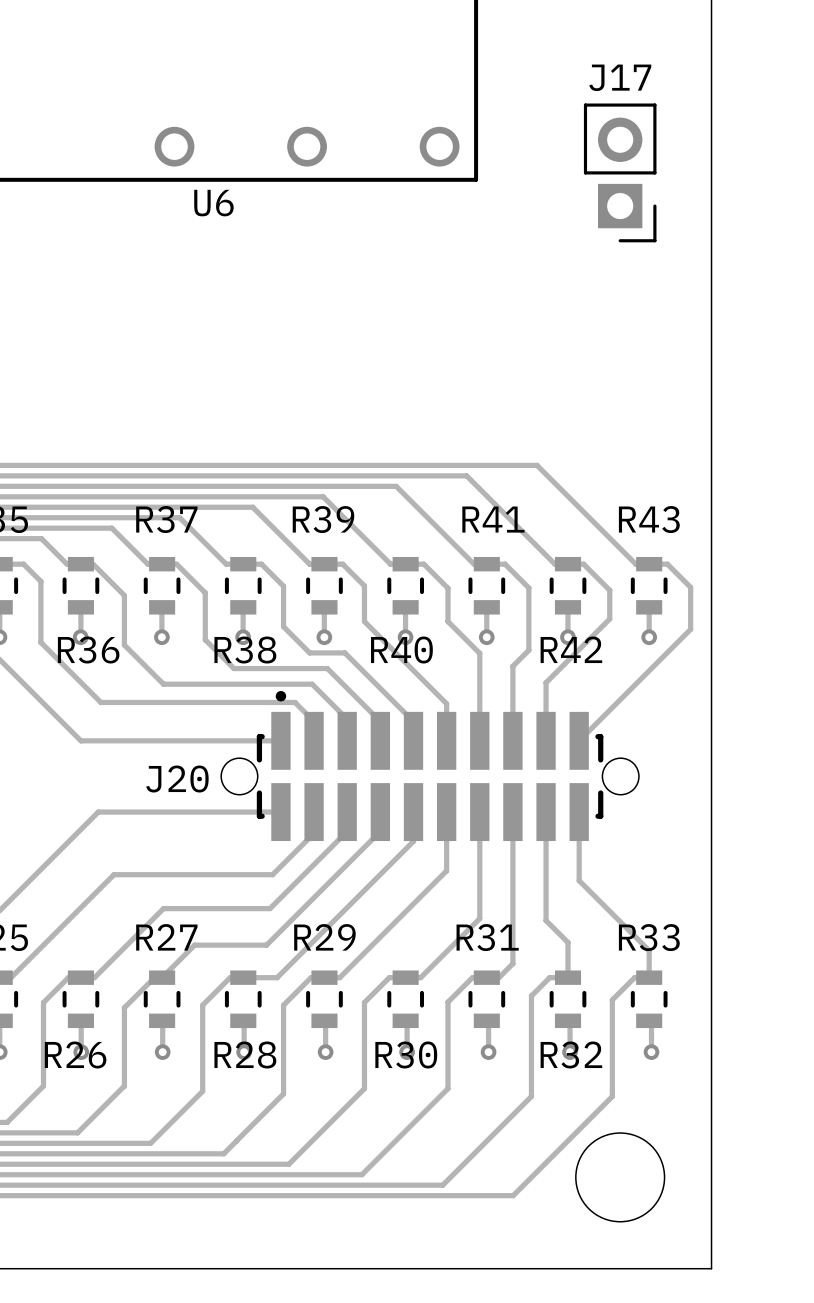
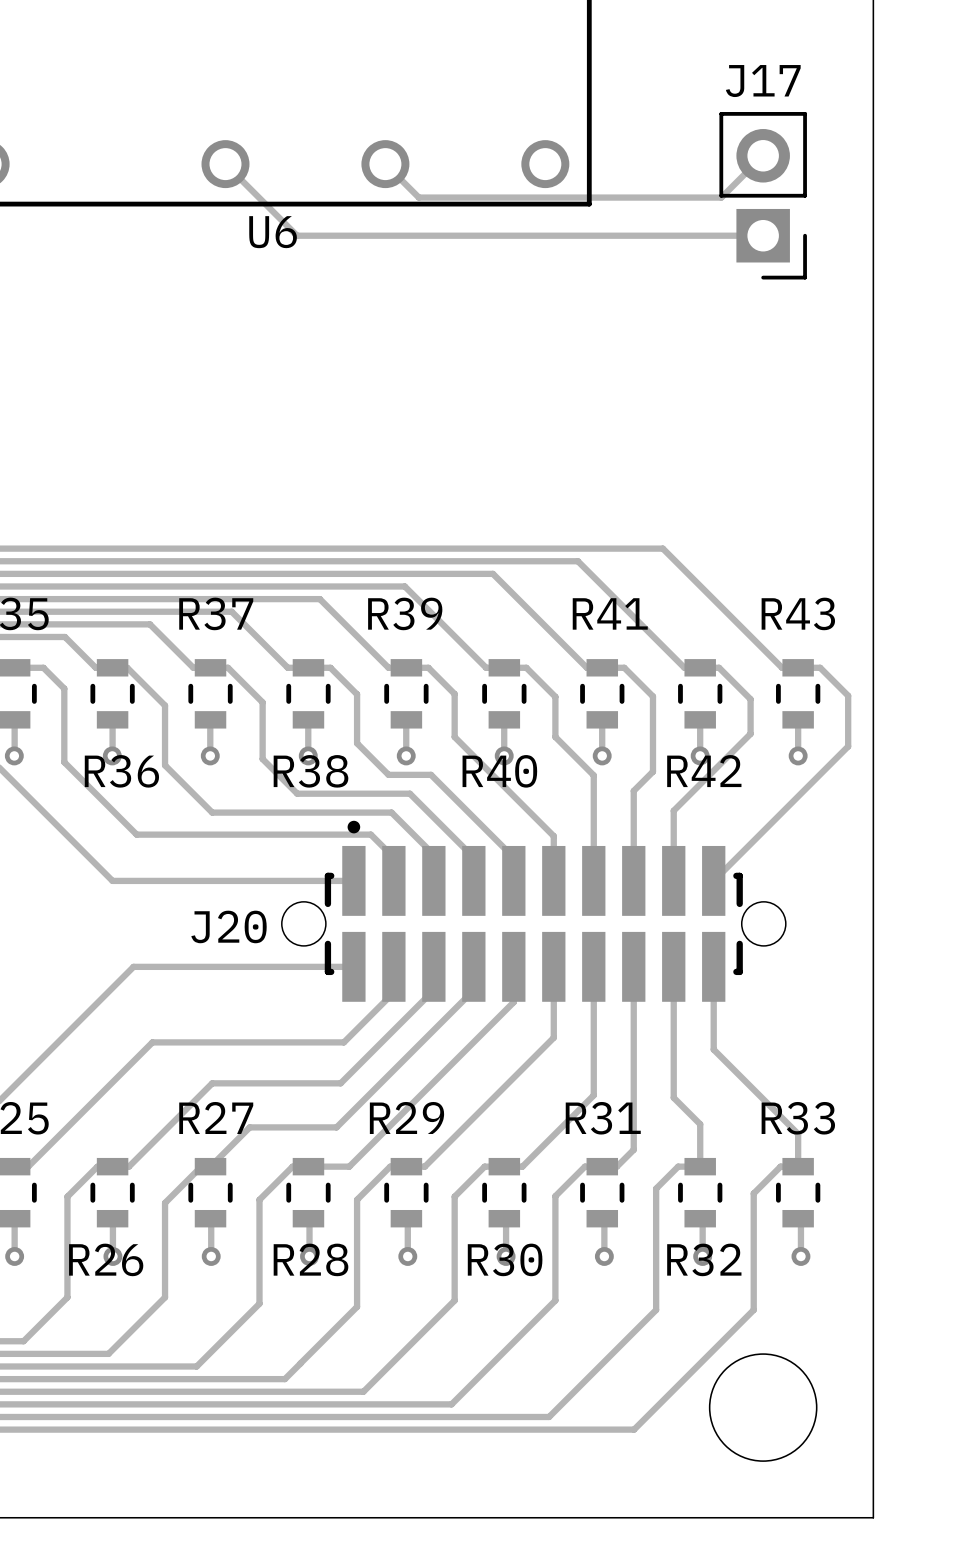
track: none -> (763, 155) (721, 197) (418, 197) (385, 164)
track: none -> (225, 164) (297, 235) (763, 235)

